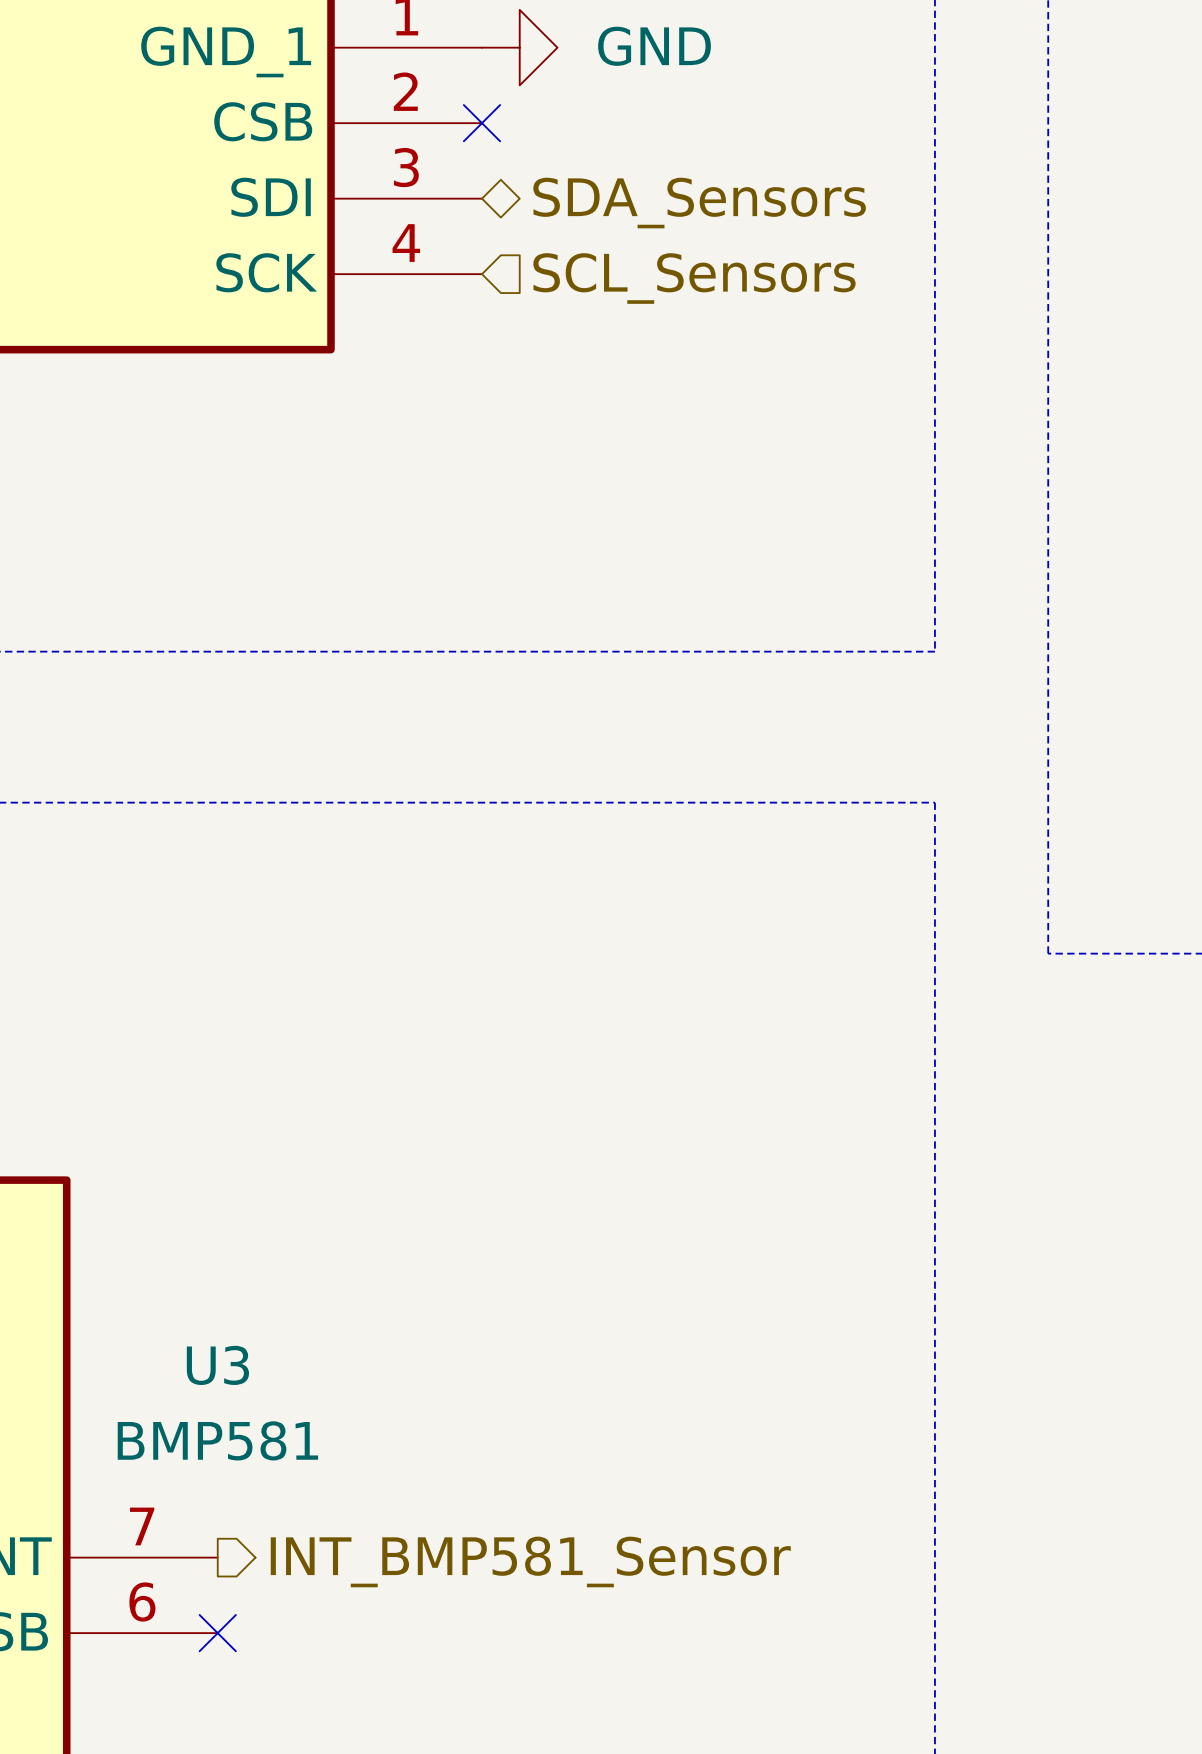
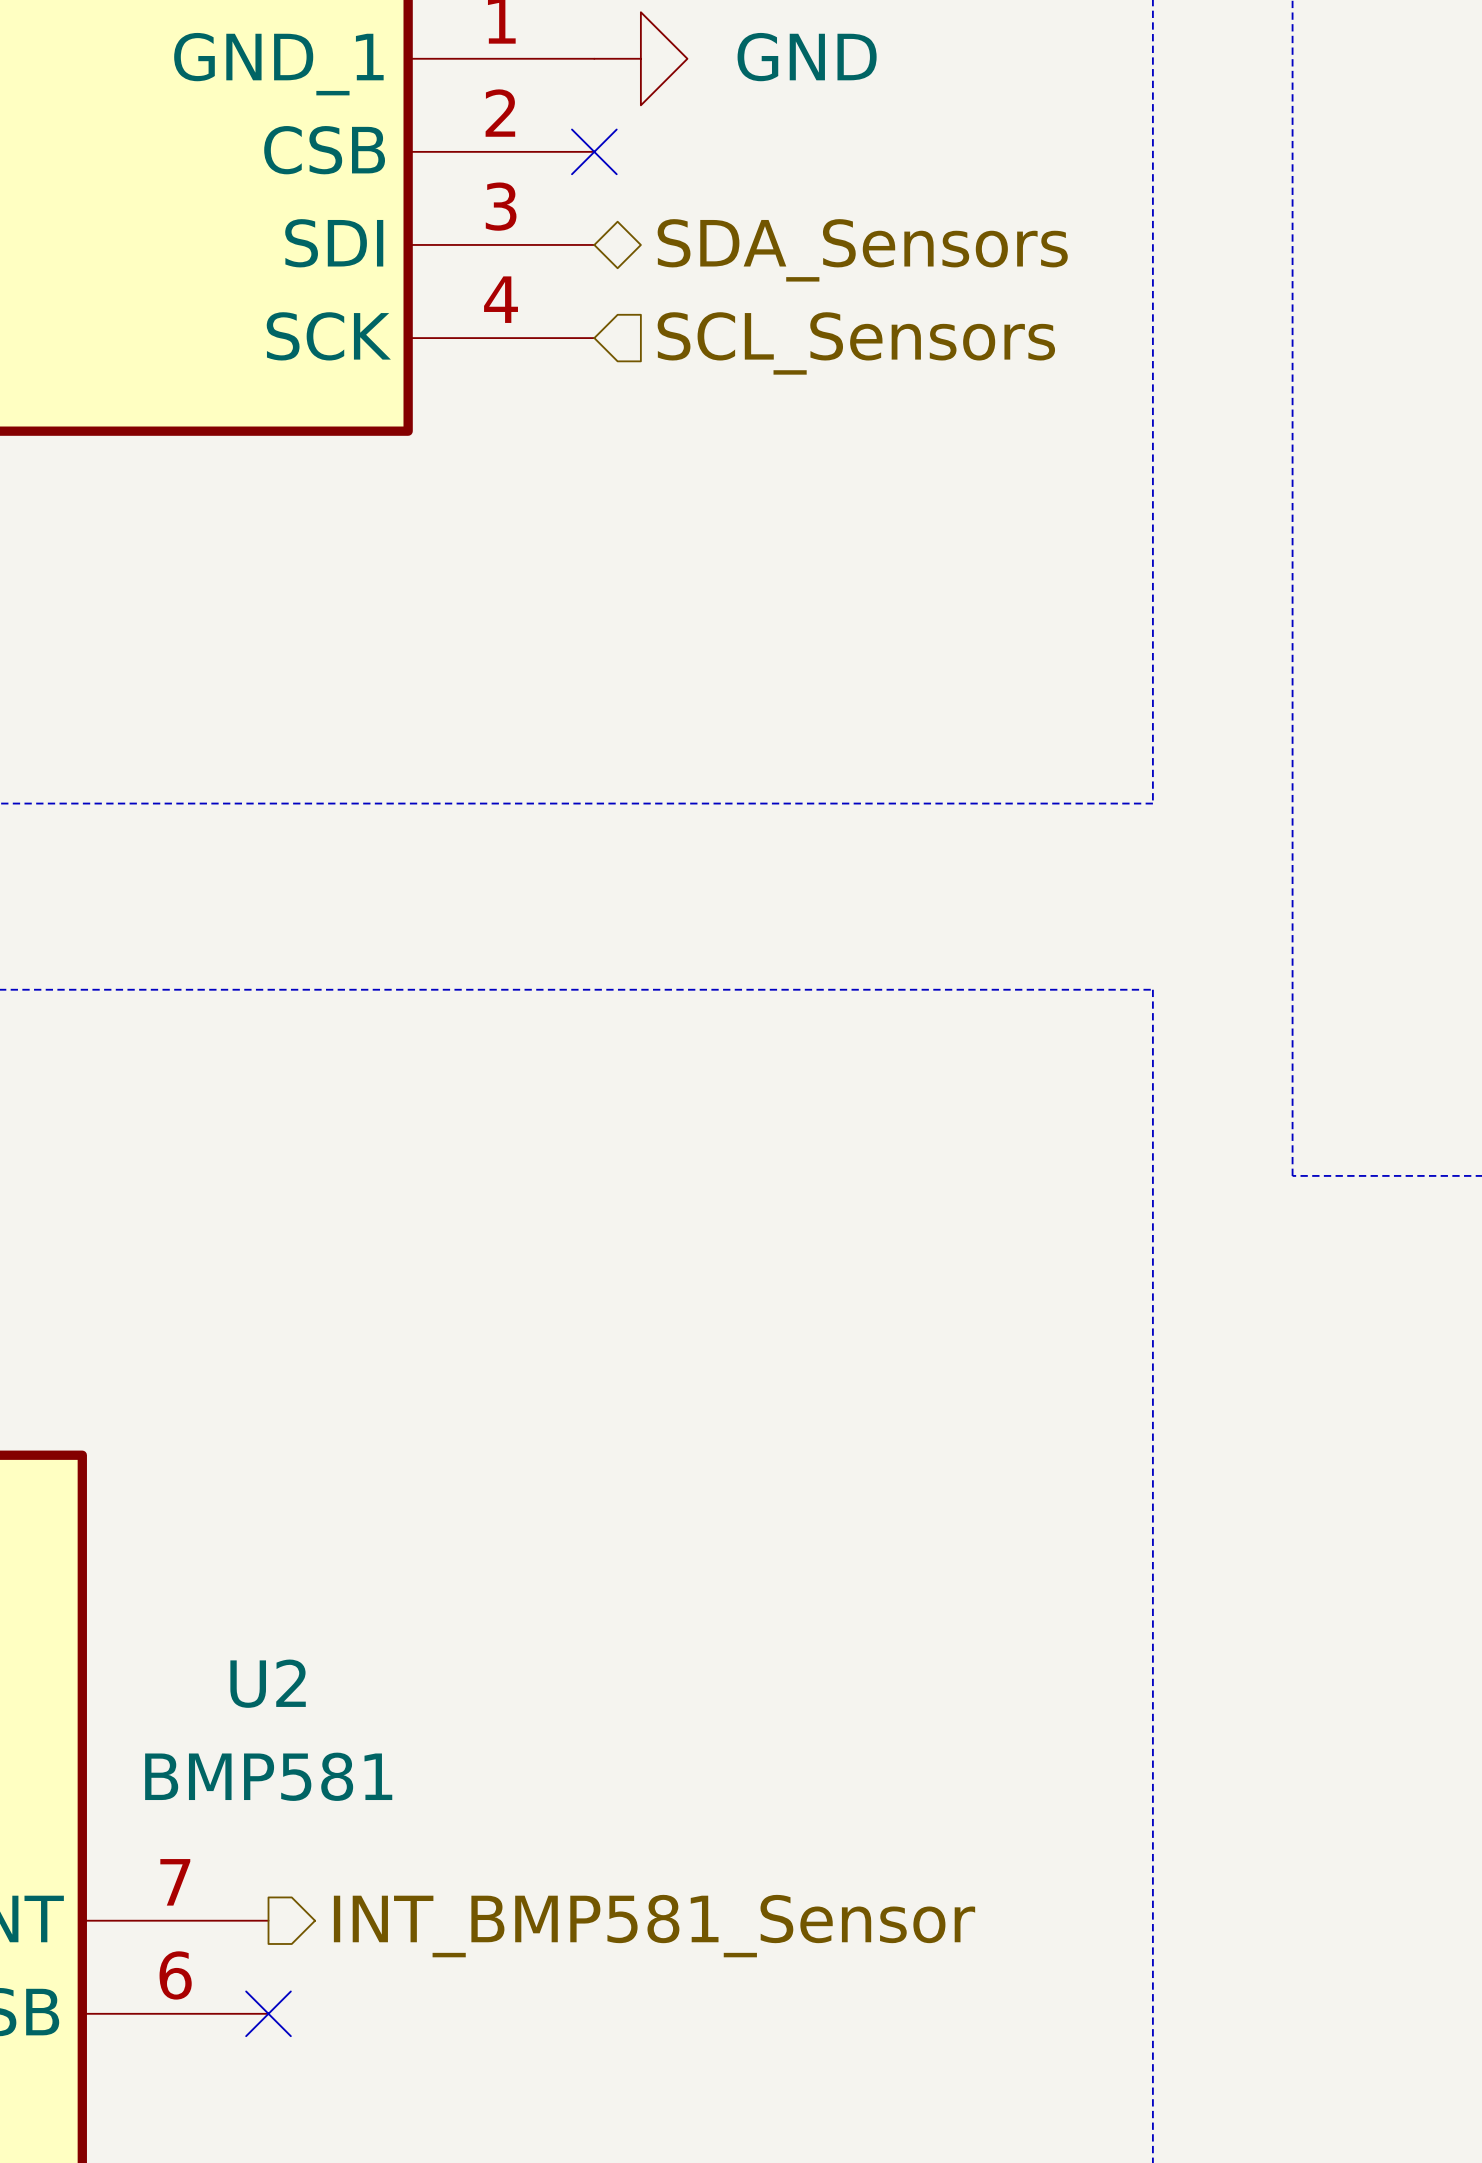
U3 name: U3 (217, 1365) -> U2 (268, 1683)

